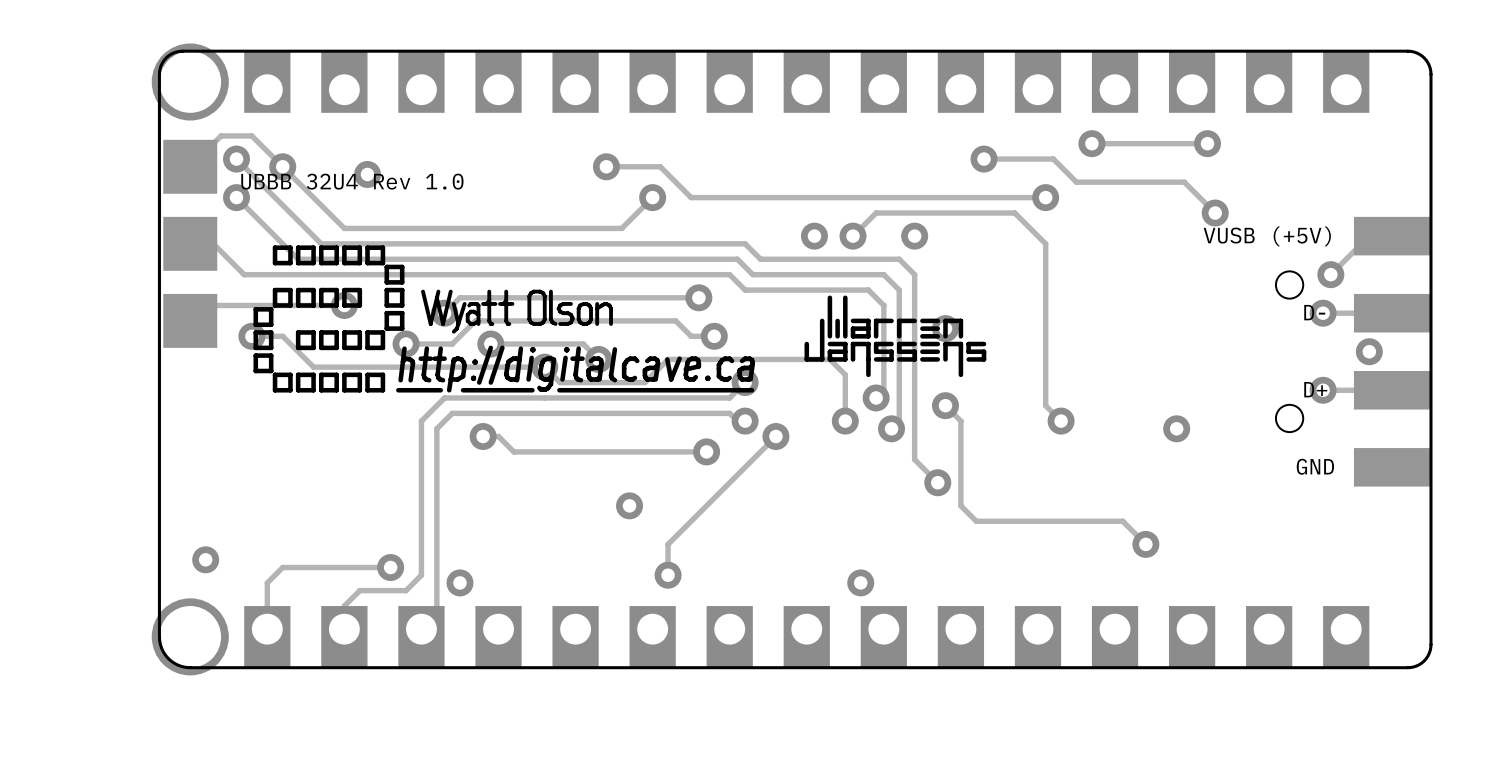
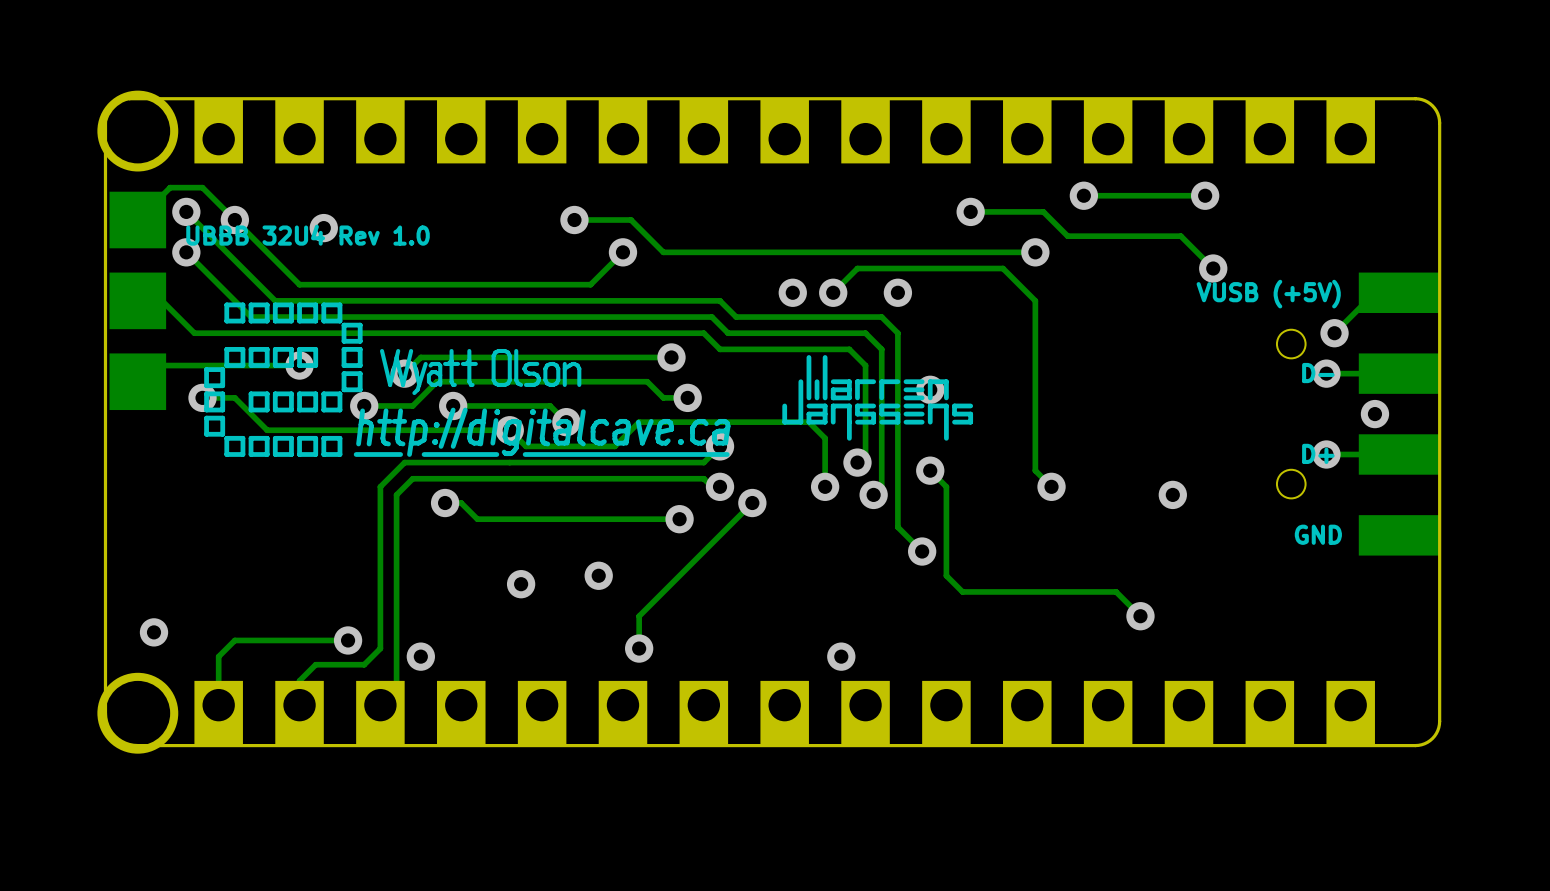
via: none -> (521, 584)

